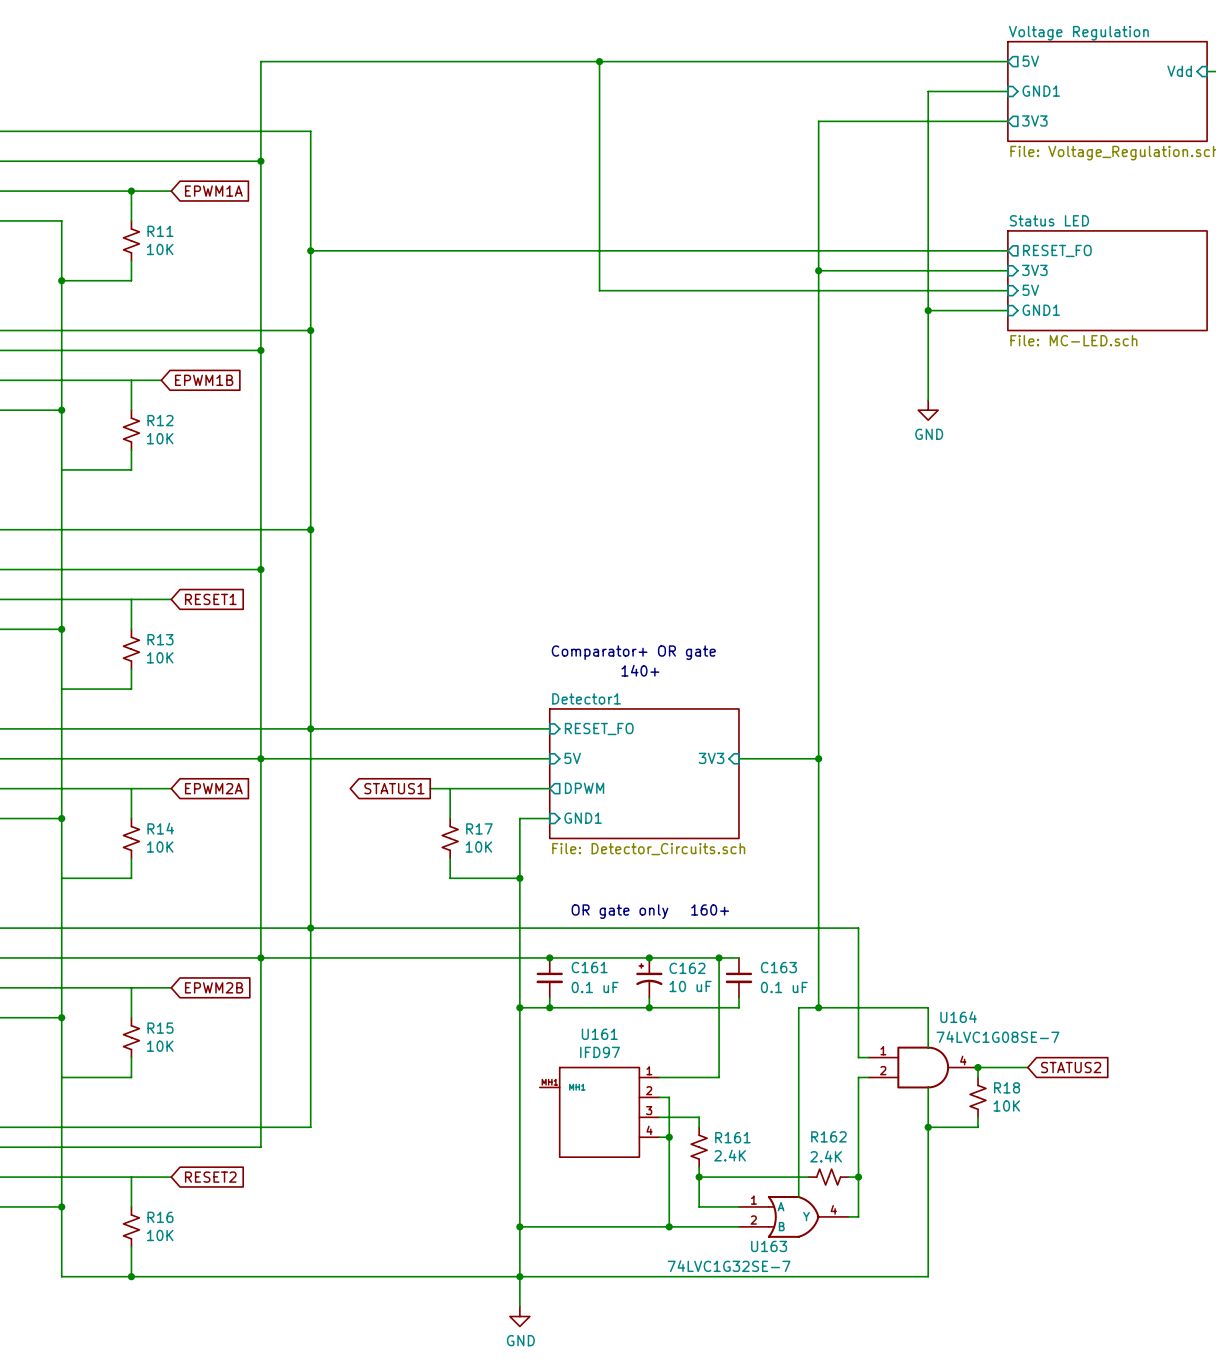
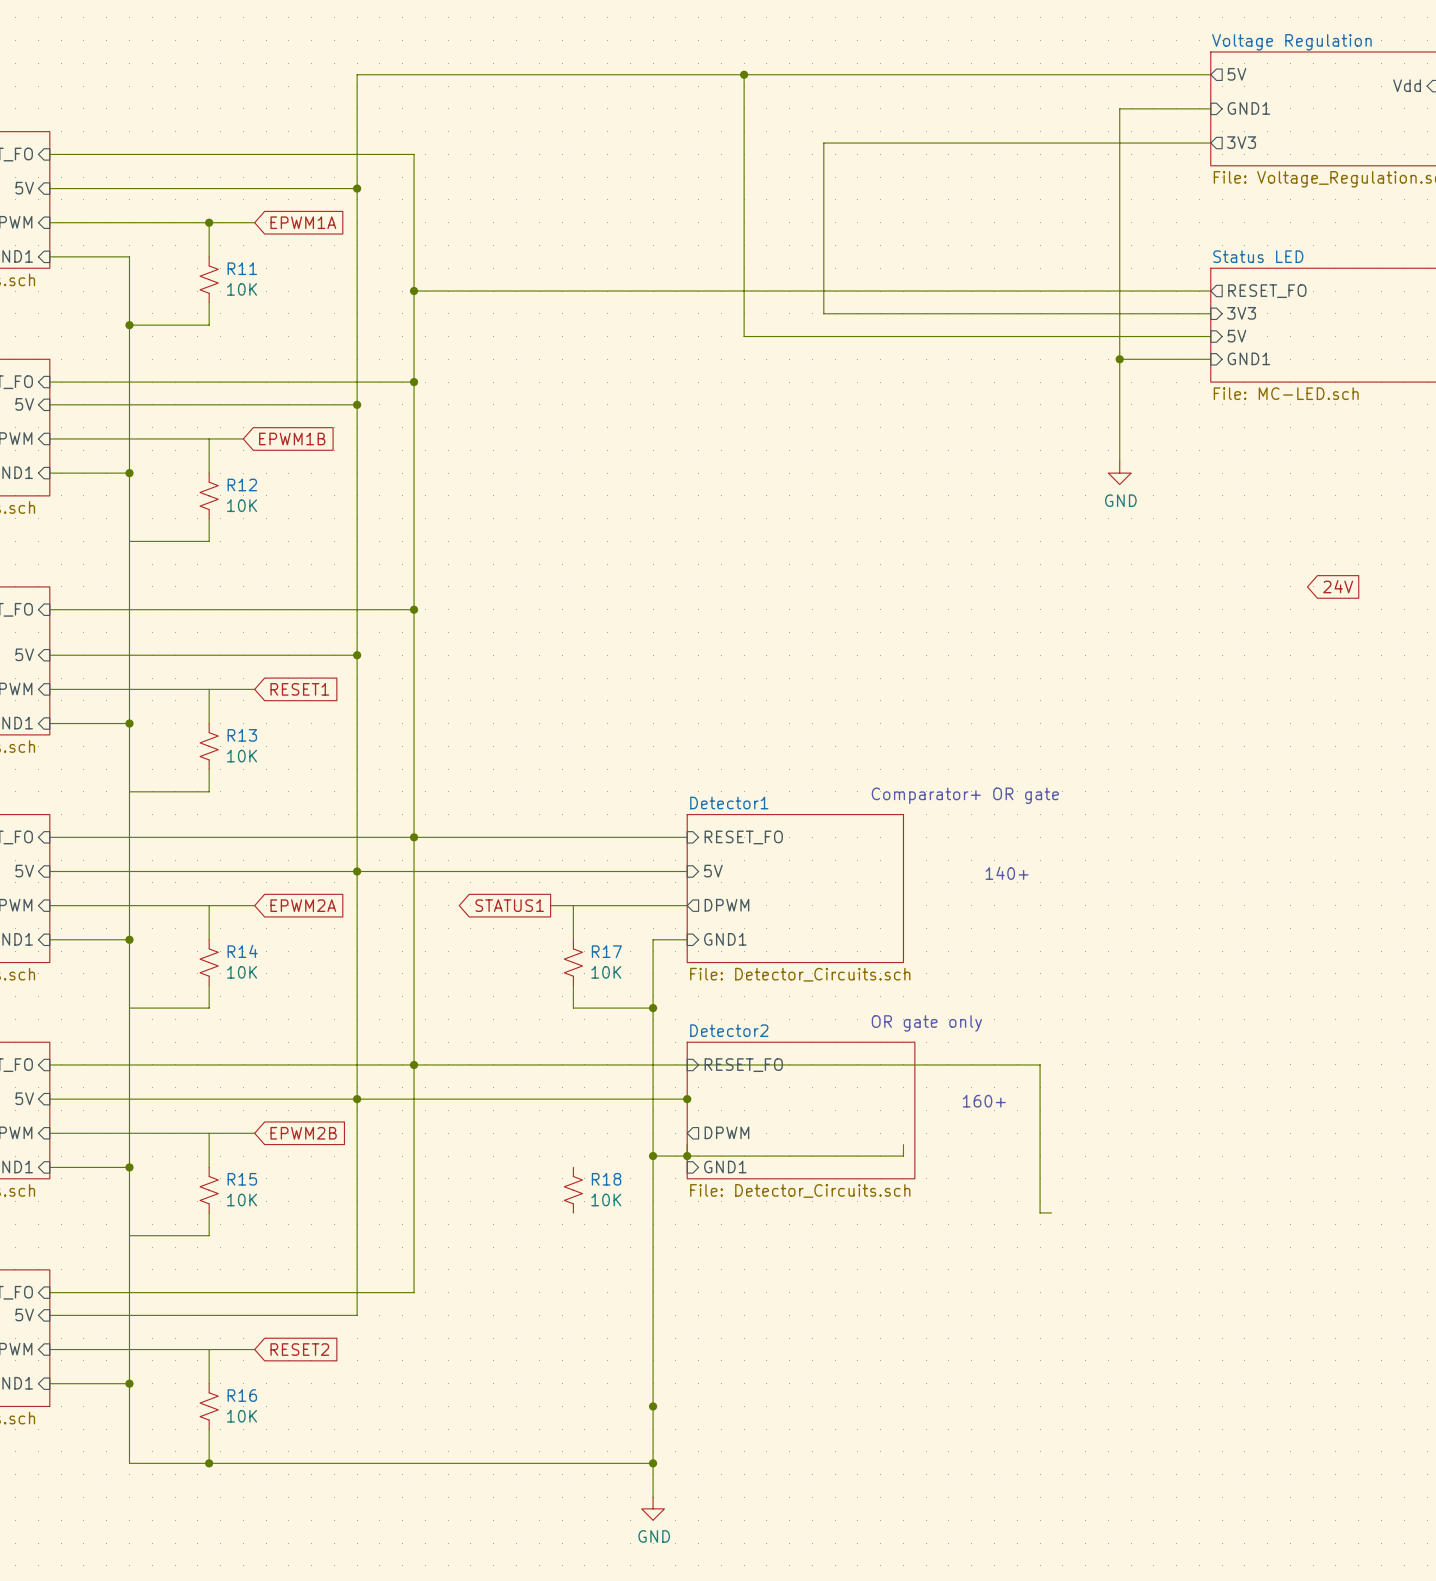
wire: (818, 121) (818, 1007) -> (994, 143) (823, 143) (823, 313) (994, 313)
junction: (818, 270) -> none
global label: none -> 24V (1338, 586)
text position: Comparator+ OR gate (633, 652) -> Comparator+ OR gate (965, 795)
text: 140+ (640, 670) -> none
sheet pin: 3V3 (711, 758) -> none
wire: (738, 758) (818, 758) -> none
junction: (818, 758) -> none
text: none -> 140+ (1007, 873)
text position: 160+ (710, 909) -> 160+ (984, 1101)
text position: OR gate only (620, 911) -> OR gate only (926, 1023)
sheet pin: none -> RESET_FO (743, 1065)
wire: (549, 957) (738, 957) -> none
junction: (649, 957) -> none
wire: (719, 957) (719, 1077) (659, 1077) -> none
junction: (719, 957) -> none
sheet Detector2: none -> File: Detector_Circuits.sch (801, 1110)
C161: 0.1 uF (549, 977) -> none
C162: 10 uF (649, 977) -> none
C163: 0.1 uF (738, 977) -> none
sheet pin: none -> DPWM (726, 1132)
wire: (649, 997) (649, 1007) -> none
junction: (649, 1007) -> none
junction: (818, 1007) -> none
sheet pin: none -> GND1 (725, 1167)
wire: (928, 1047) (928, 1007) (798, 1007) (798, 1197) -> none
U164: 74LVC1G08SE-7 (923, 1067) -> none
junction: (978, 1067) -> none
wire: (1027, 1067) (978, 1067) (978, 1077) -> none
global label: STATUS2 (1071, 1067) -> none
wire: (868, 1077) (858, 1077) (858, 1216) (848, 1216) -> none
wire: (928, 1087) (928, 1276) (519, 1276) -> none
wire: (659, 1097) (669, 1097) (669, 1226) -> none
R18 position: (978, 1097) -> (573, 1190)
U161: IFD97 (599, 1112) -> none
wire: (659, 1117) (699, 1117) (699, 1127) -> none
wire: (978, 1117) (978, 1127) (928, 1127) -> none
junction: (928, 1127) -> none
wire: (659, 1137) (669, 1137) -> none
junction: (669, 1137) -> none
R161: 2.4K (699, 1147) -> none
wire: (699, 1167) (699, 1206) (738, 1206) -> none
wire: (699, 1177) (808, 1177) -> none
junction: (699, 1177) -> none
R162: 2.4K (828, 1177) -> none
wire: (848, 1177) (858, 1177) -> none
junction: (858, 1177) -> none
U163: 74LVC1G32SE-7 (793, 1216) -> none
wire: (519, 1226) (738, 1226) -> none
junction: (669, 1226) -> none

